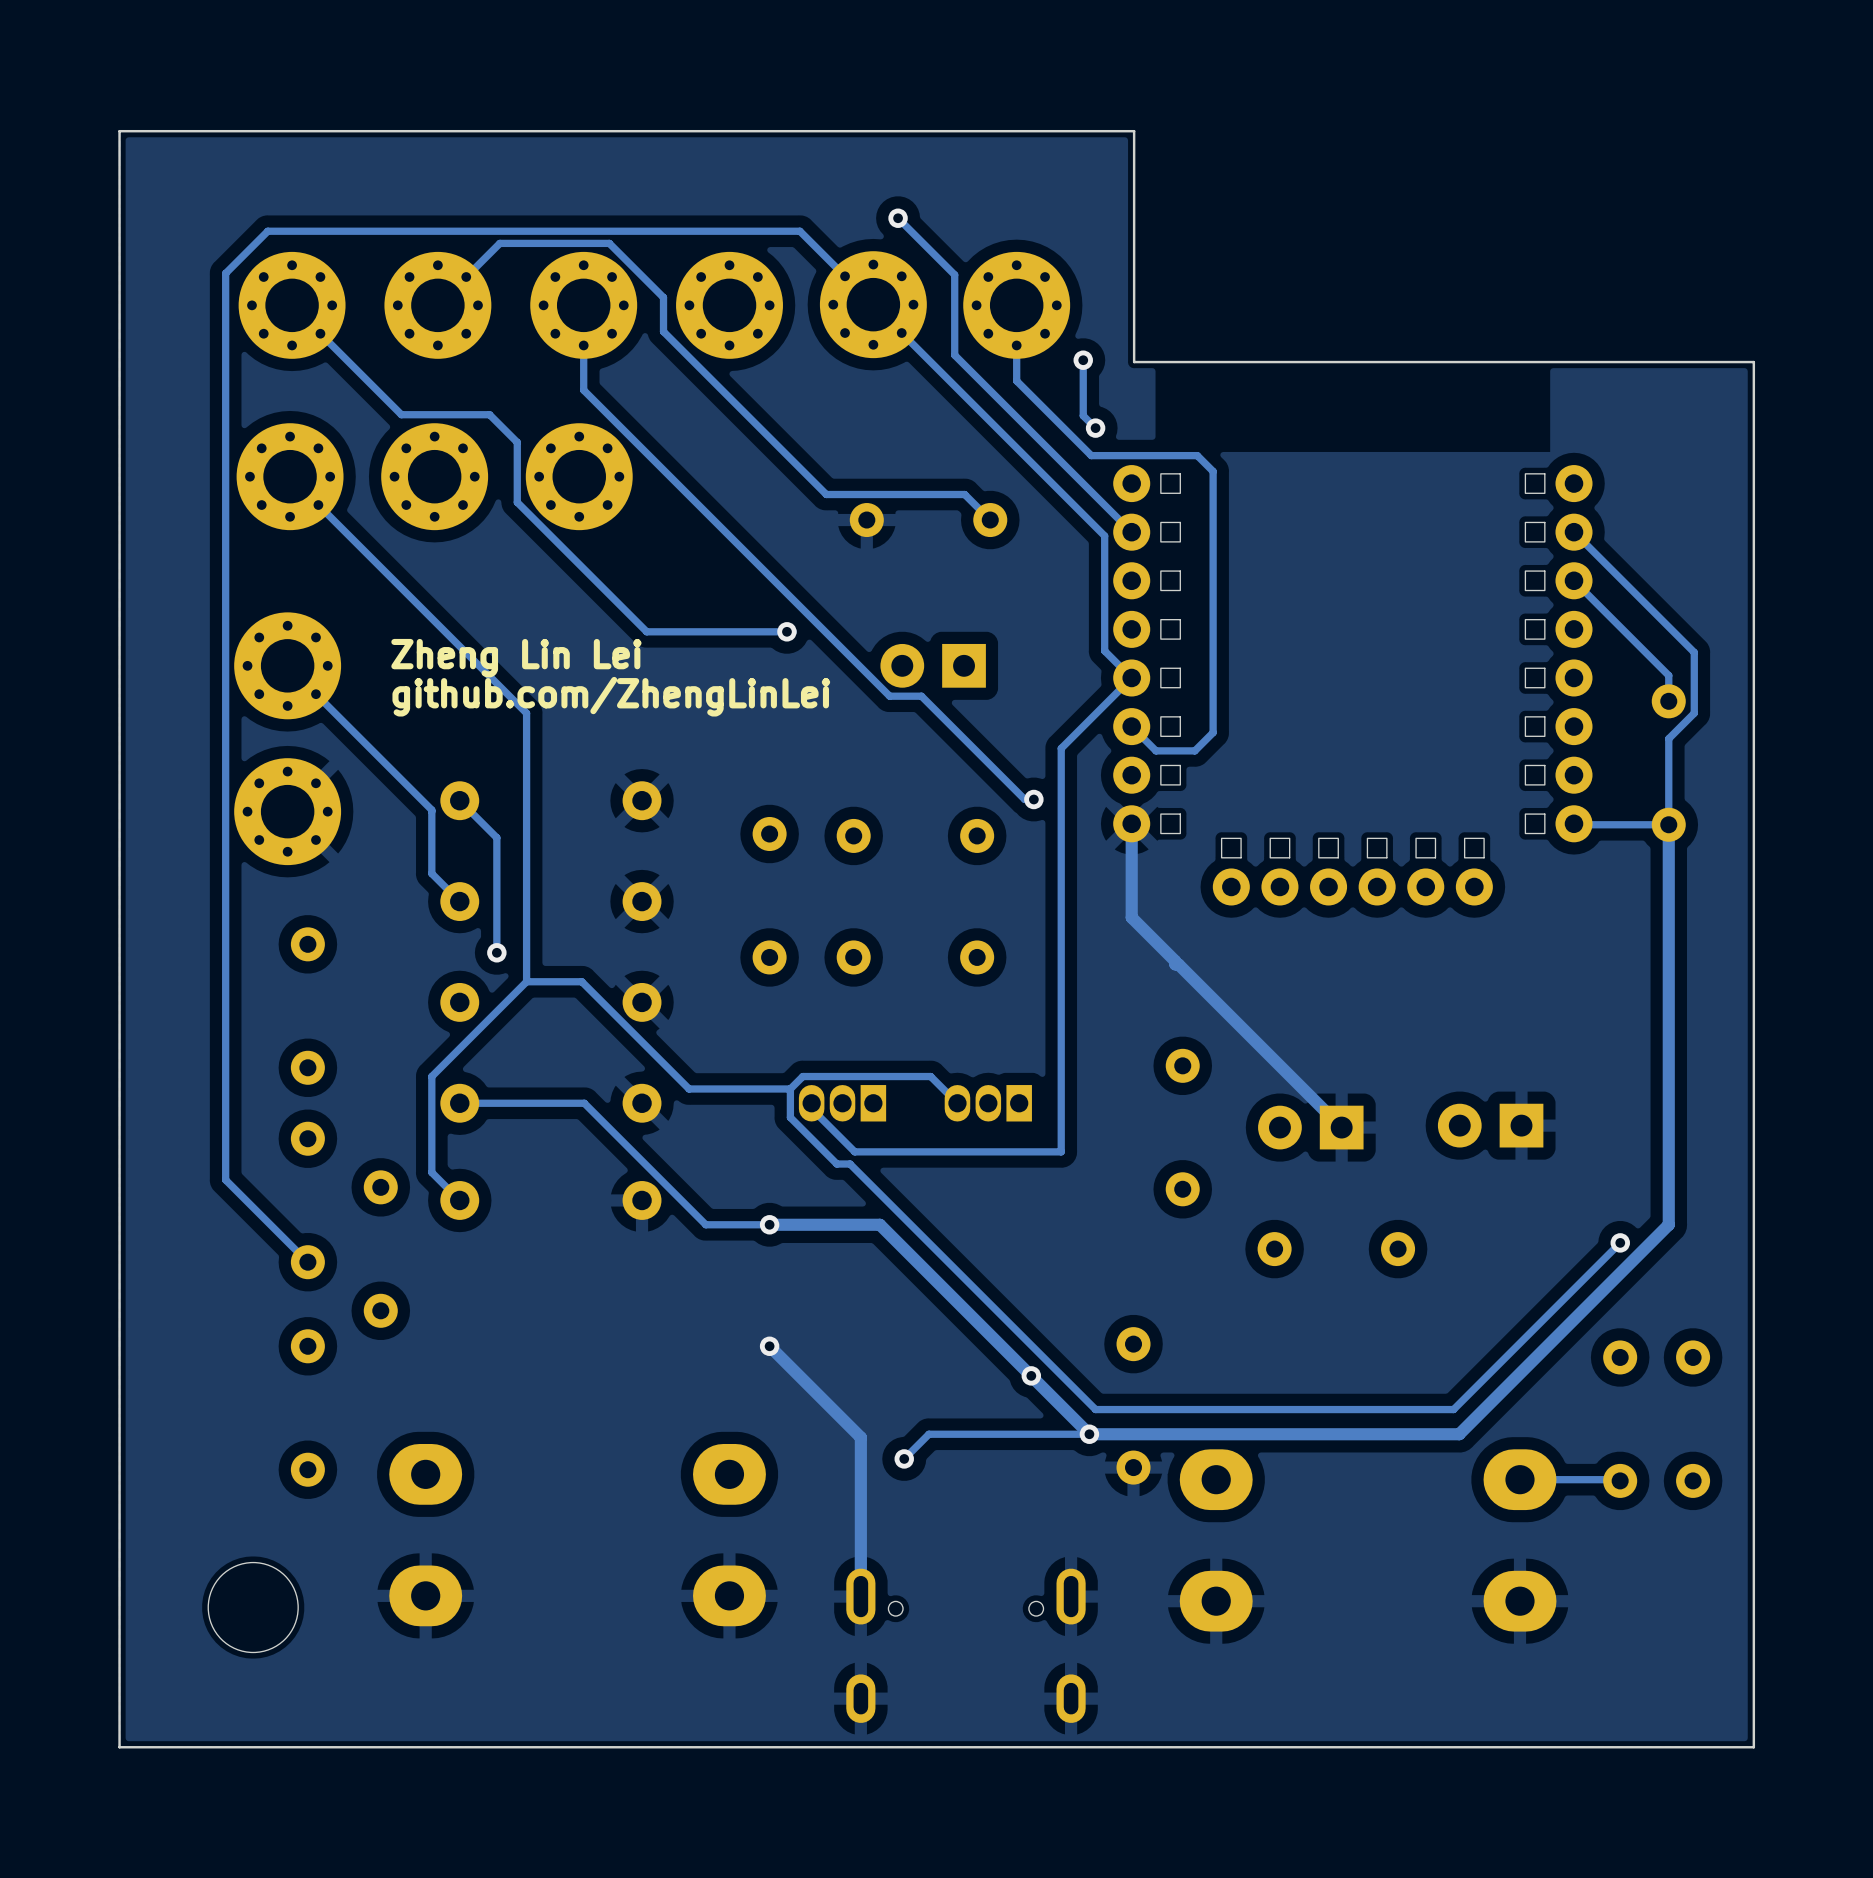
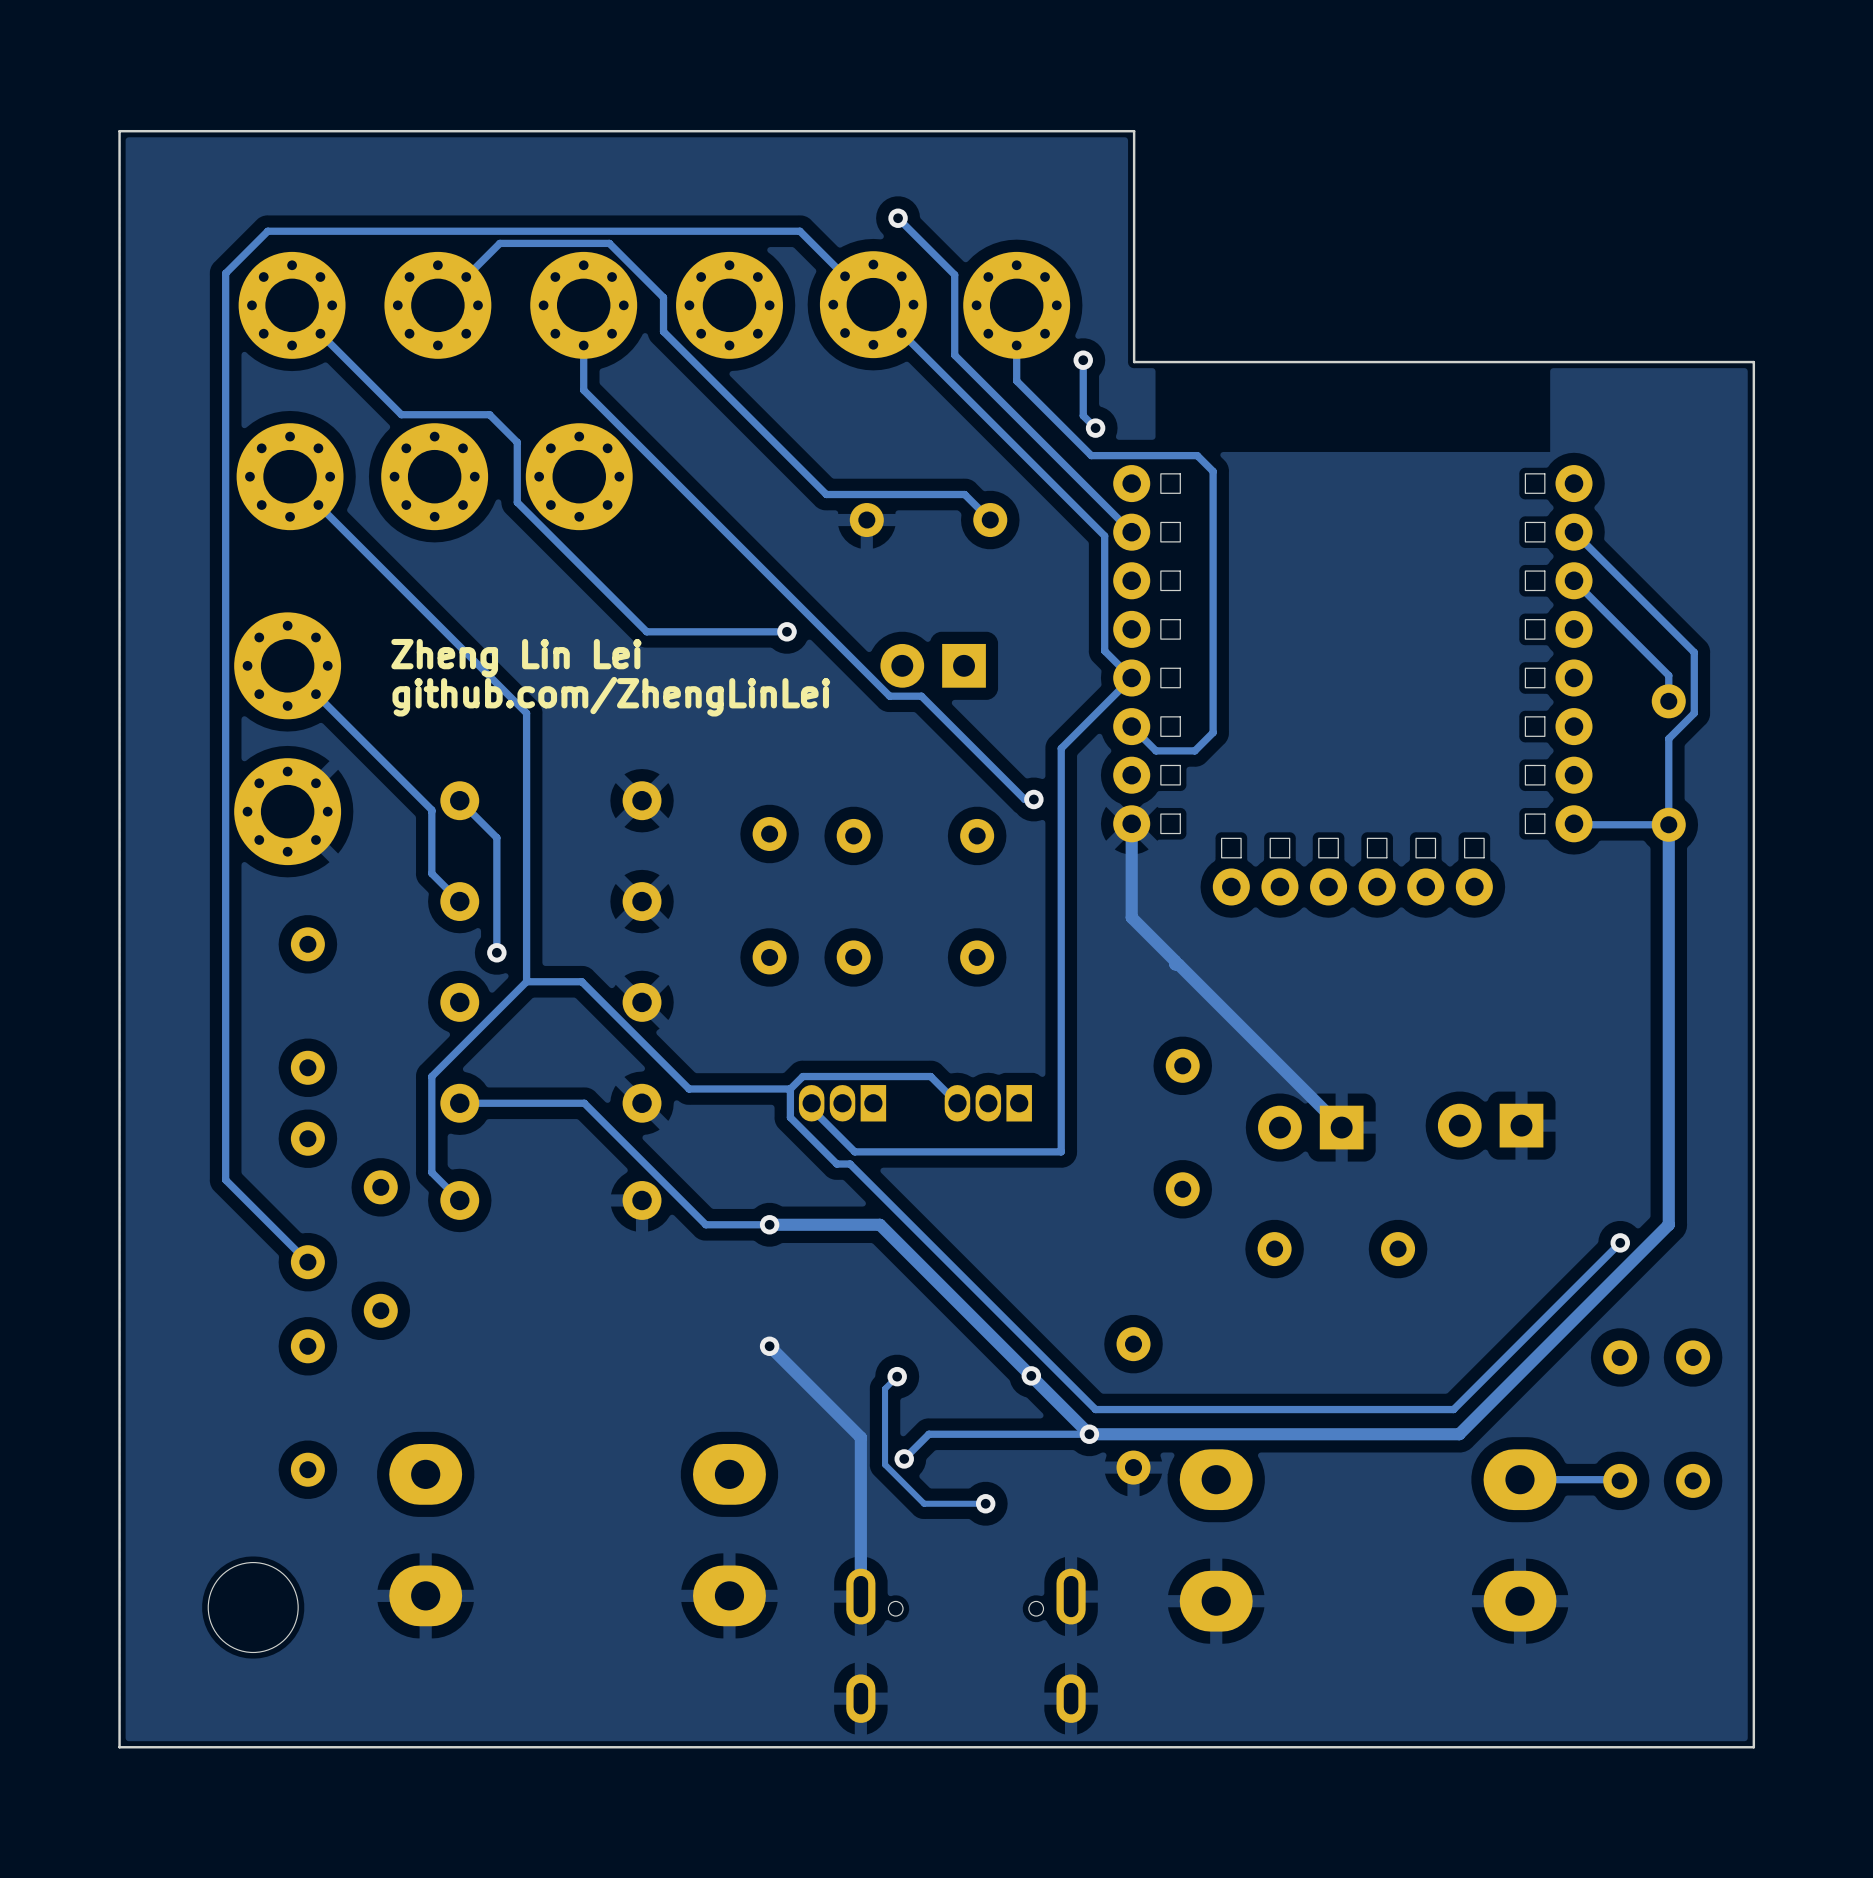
track: none -> (897, 1376) (885, 1388) (885, 1464) (924, 1503) (985, 1503)
via: none -> (897, 1376)
via: none -> (985, 1503)

